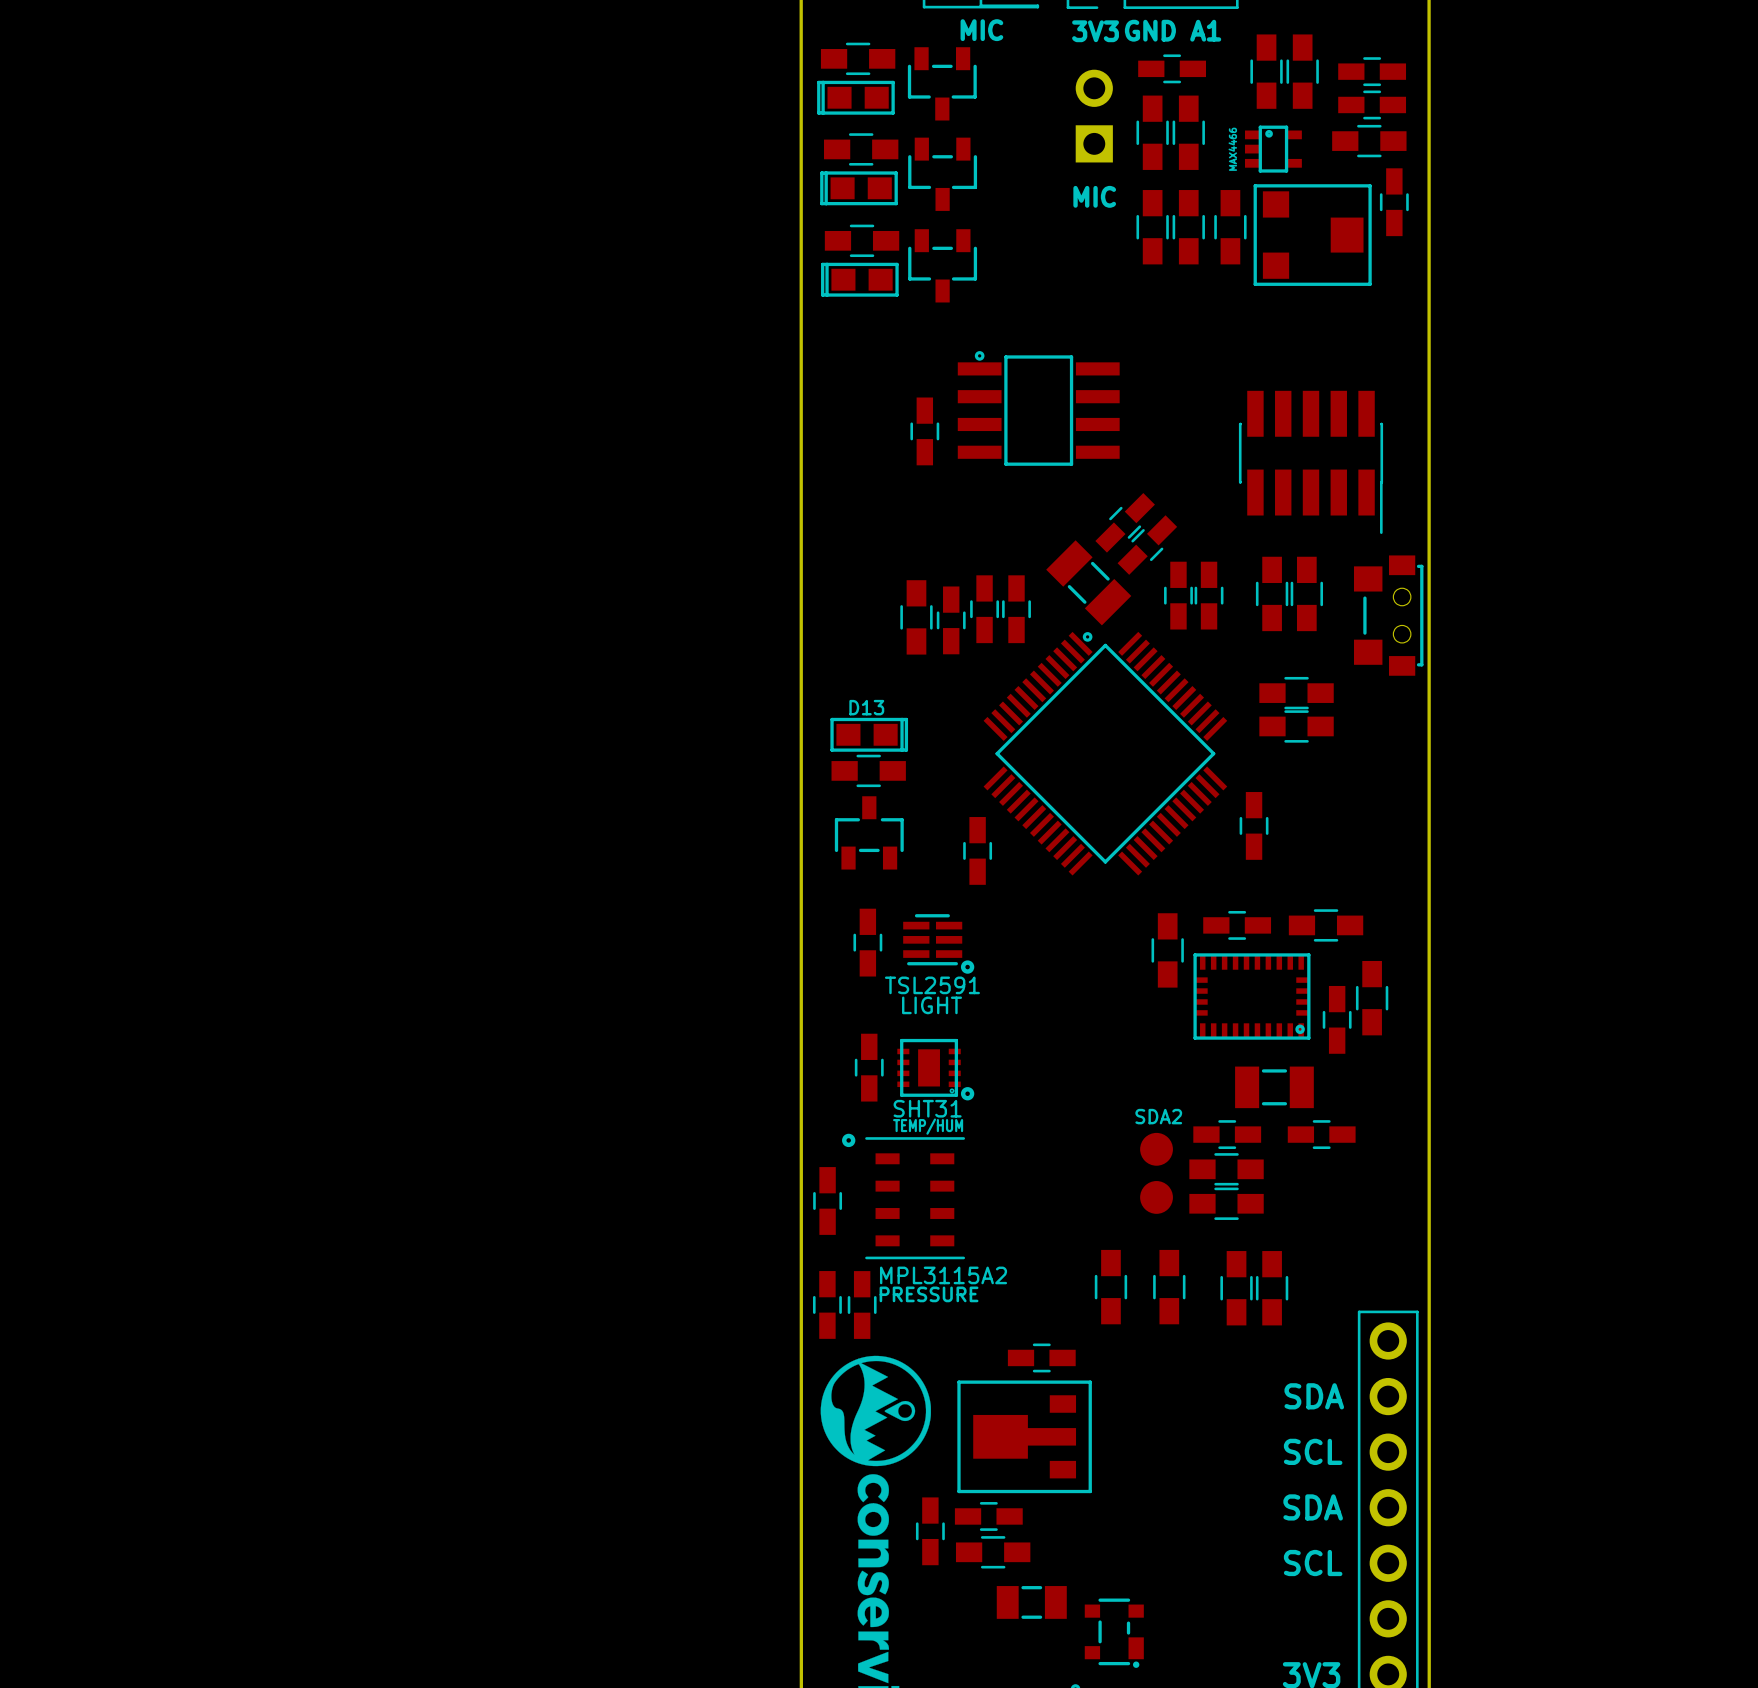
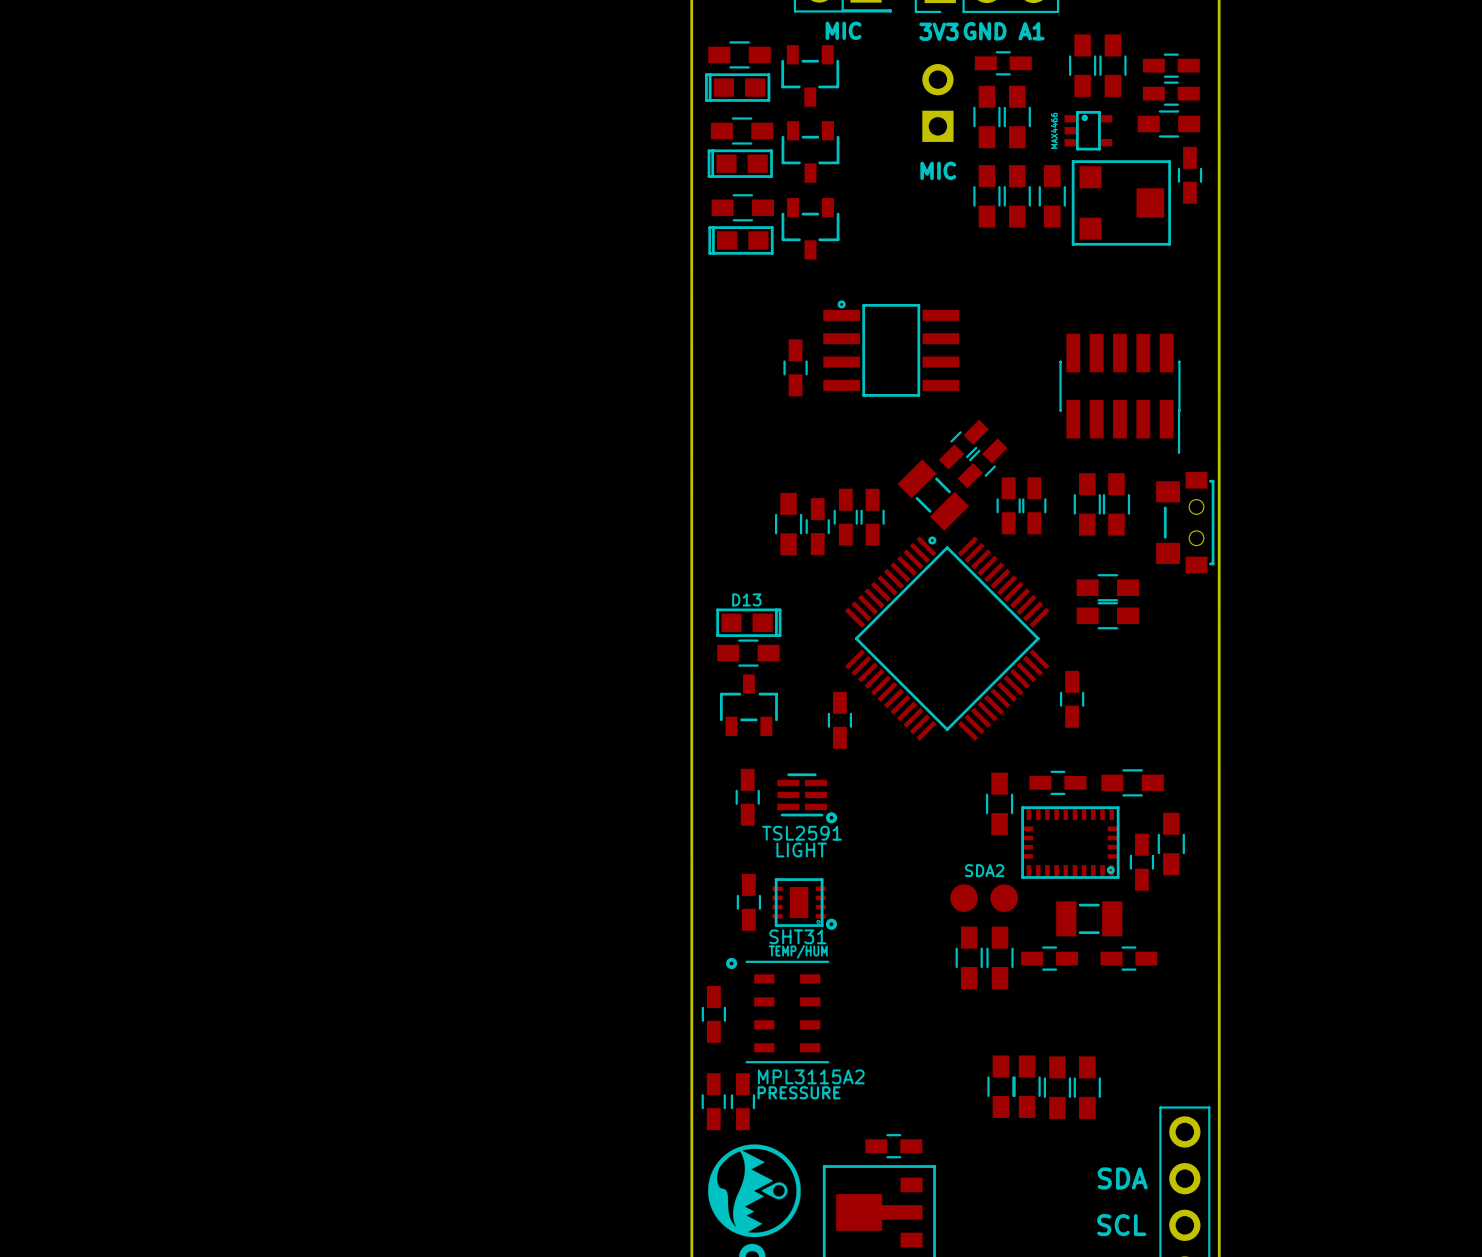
part: none -> (964, 898)
part: none -> (1004, 898)
text position: SDA2 (1158, 1116) -> SDA2 (984, 870)
part: none -> (969, 957)
part: none -> (1000, 957)
part: (1156, 1149) -> none
part: (1226, 1169) -> none
part: (1156, 1197) -> none
part: (1226, 1203) -> none
part: (1110, 1287) -> none
part: none -> (1027, 1086)

